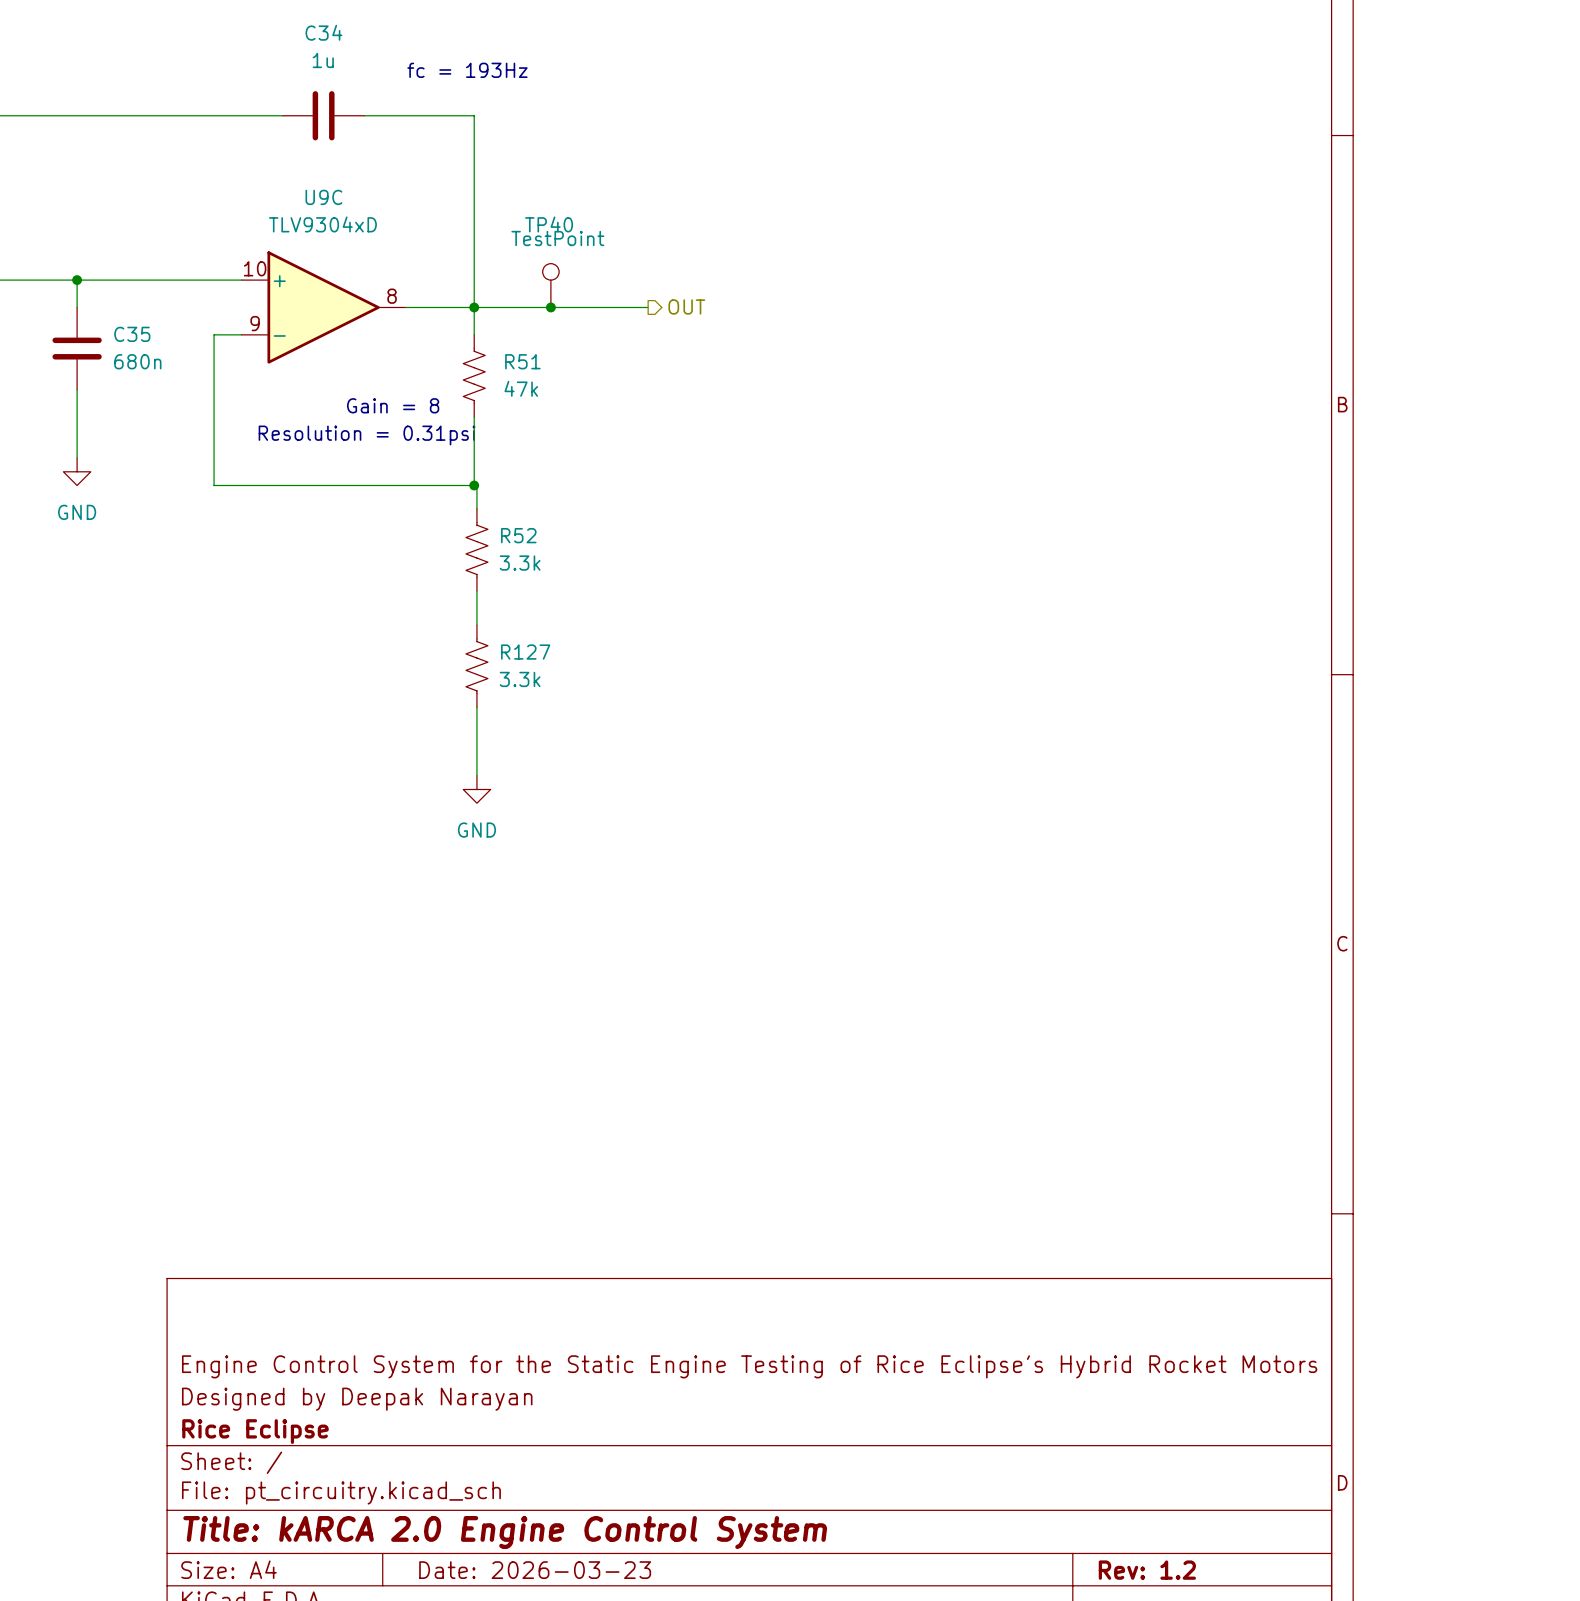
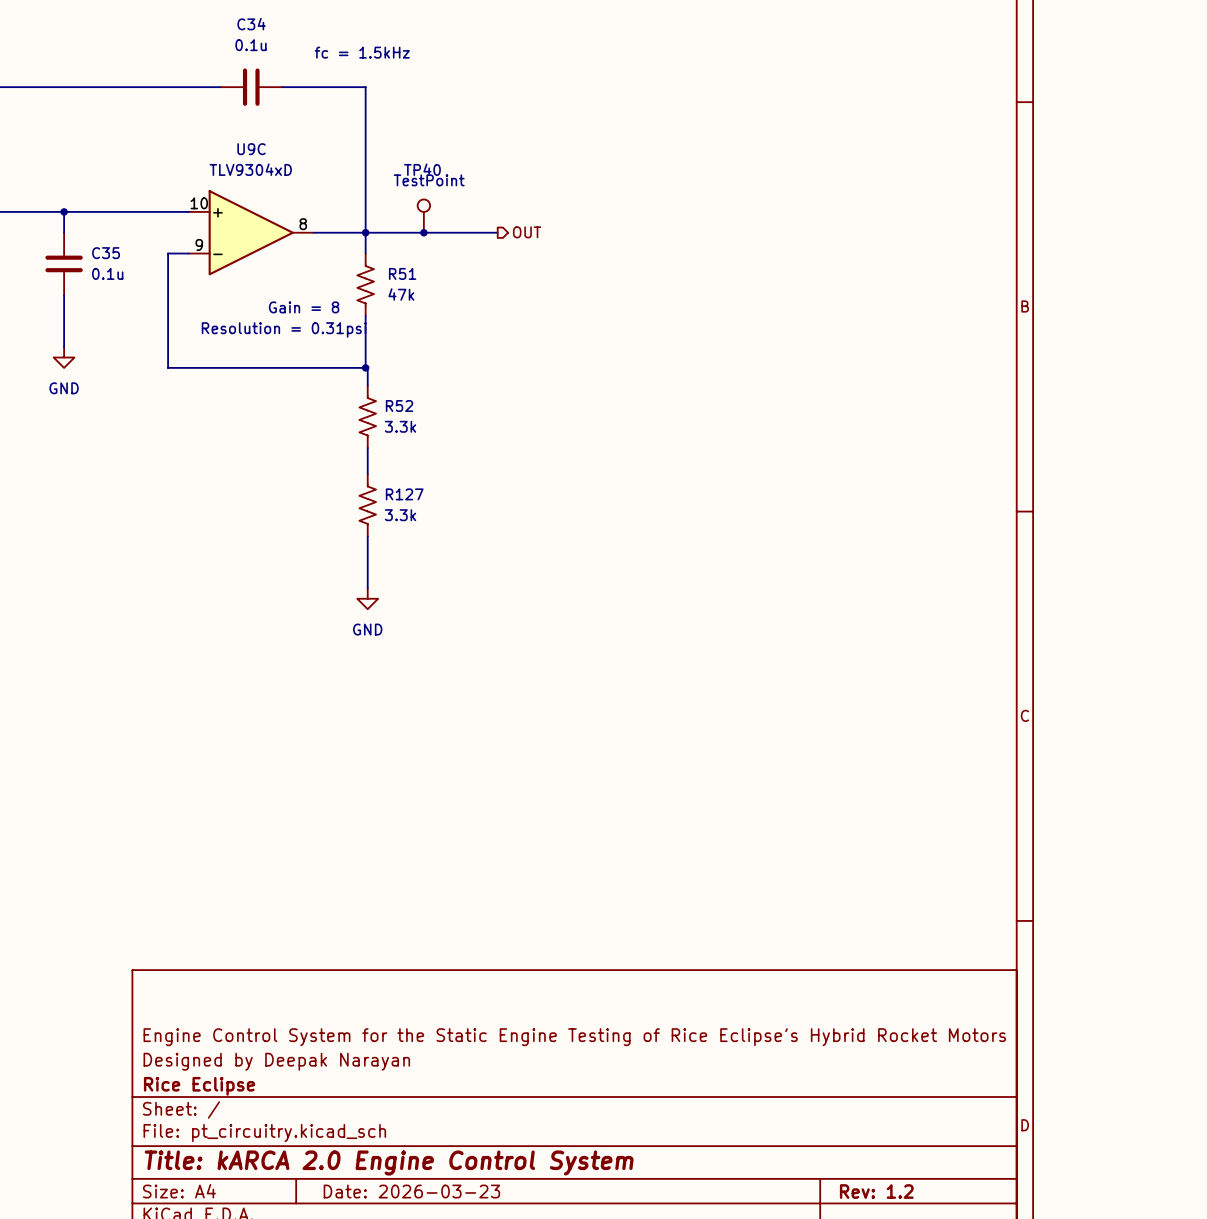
C34 value: 1u (323, 60) -> 0.1u (251, 45)
text: fc = 193Hz (467, 70) -> fc = 1.5kHz (362, 52)
C35 value: 680n (137, 361) -> 0.1u (107, 273)

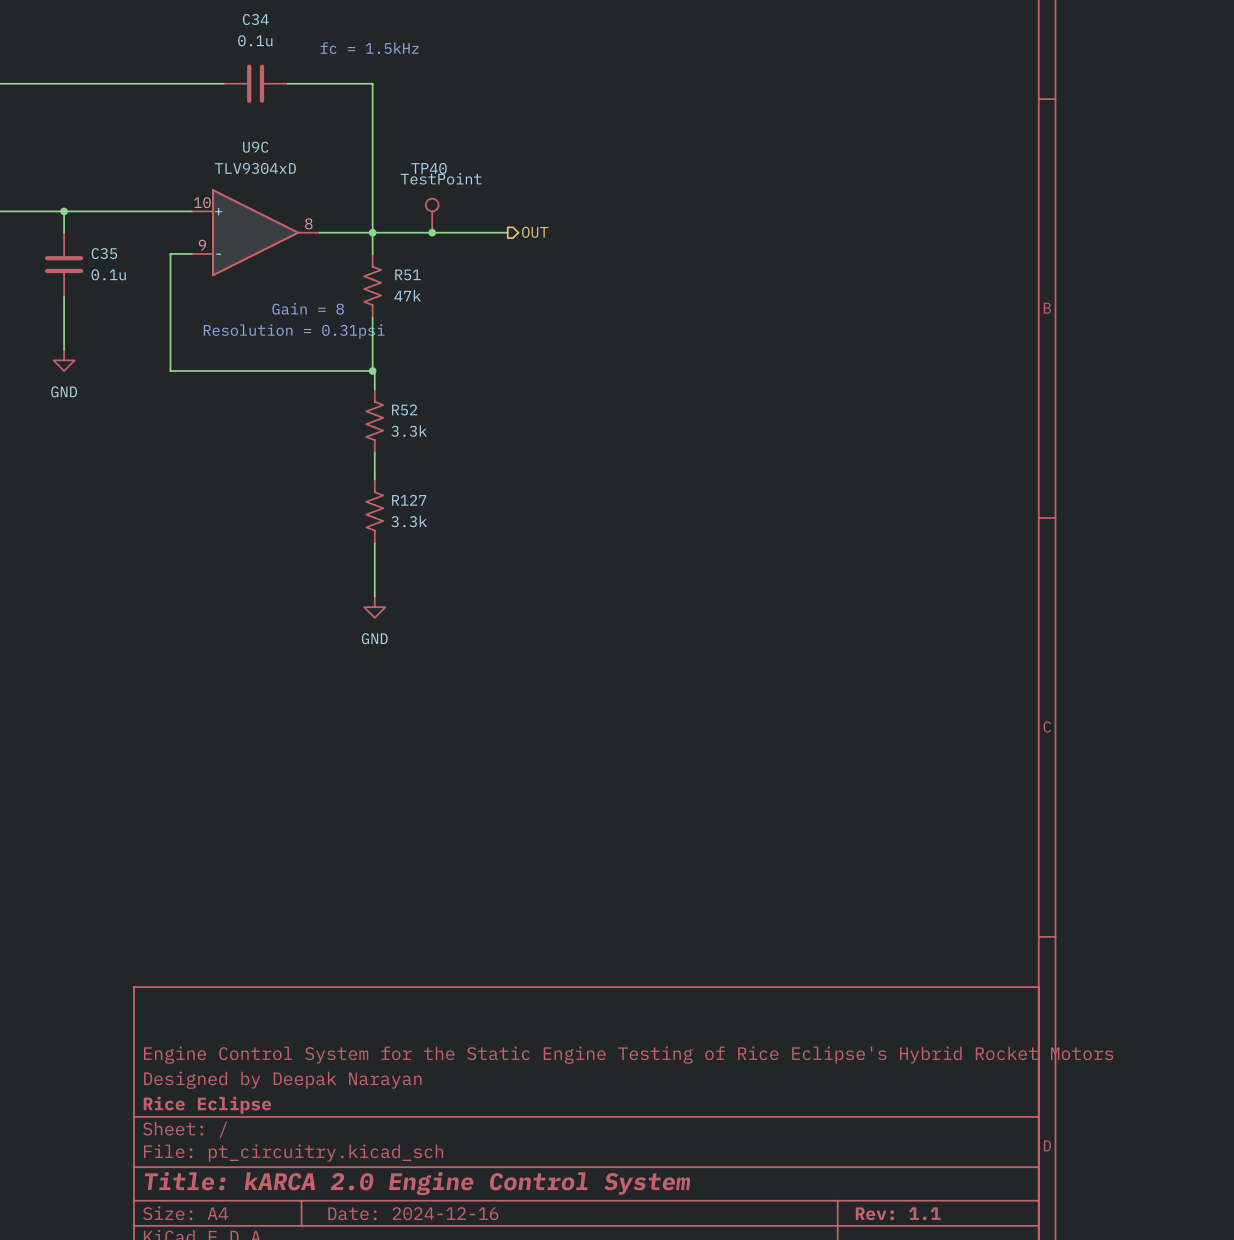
title block: Date: 2026-03-23 (411, 1191) -> Date: 2024-12-16 (413, 1213)
title block: Rev: 1.2 (876, 1191) -> Rev: 1.1 (898, 1213)

